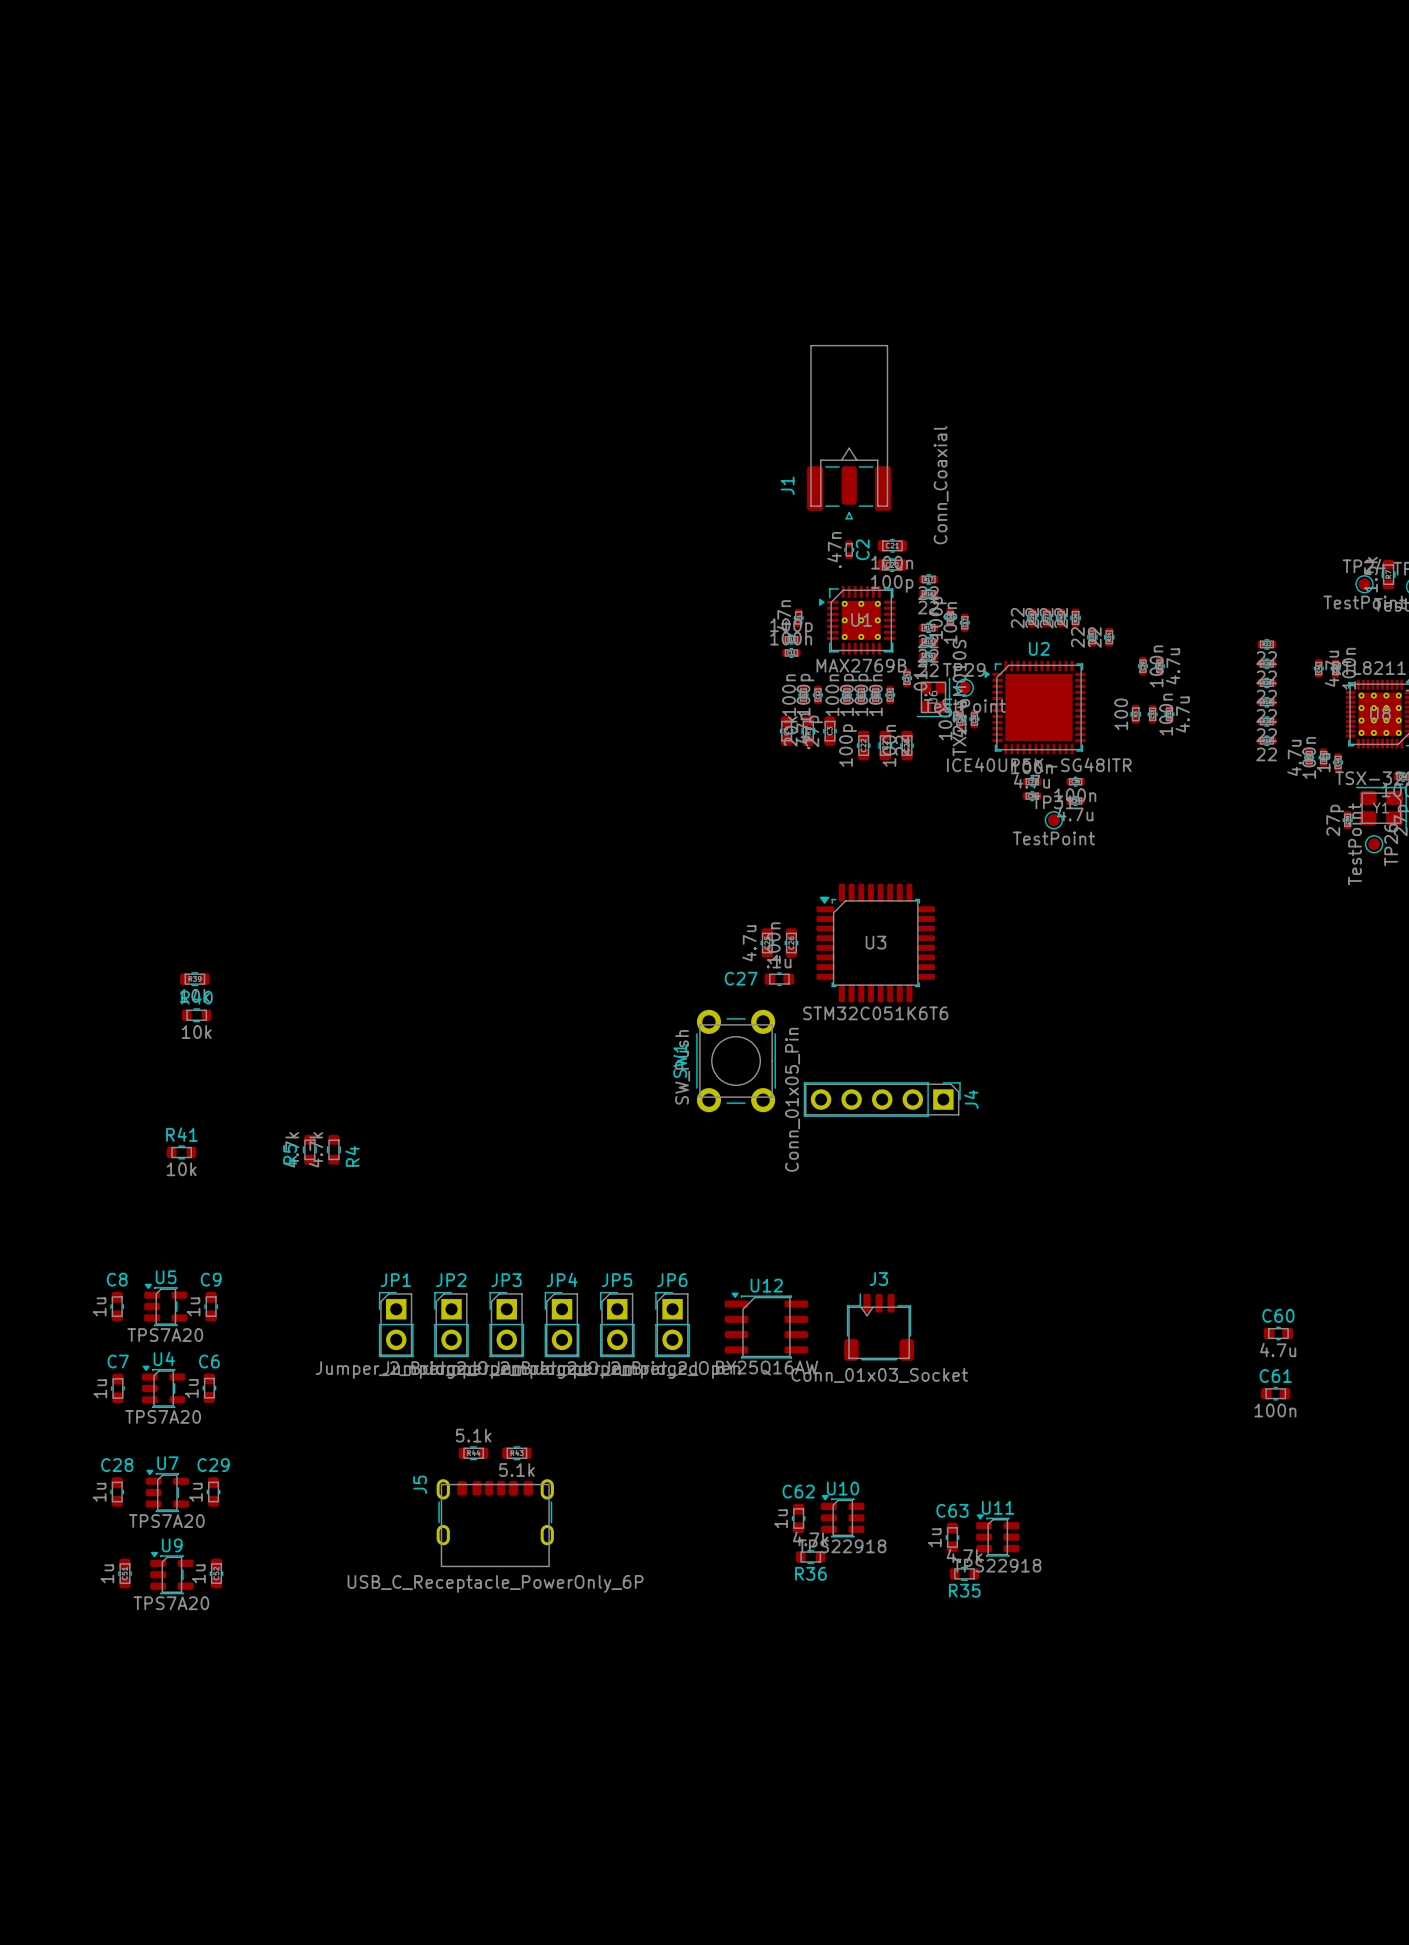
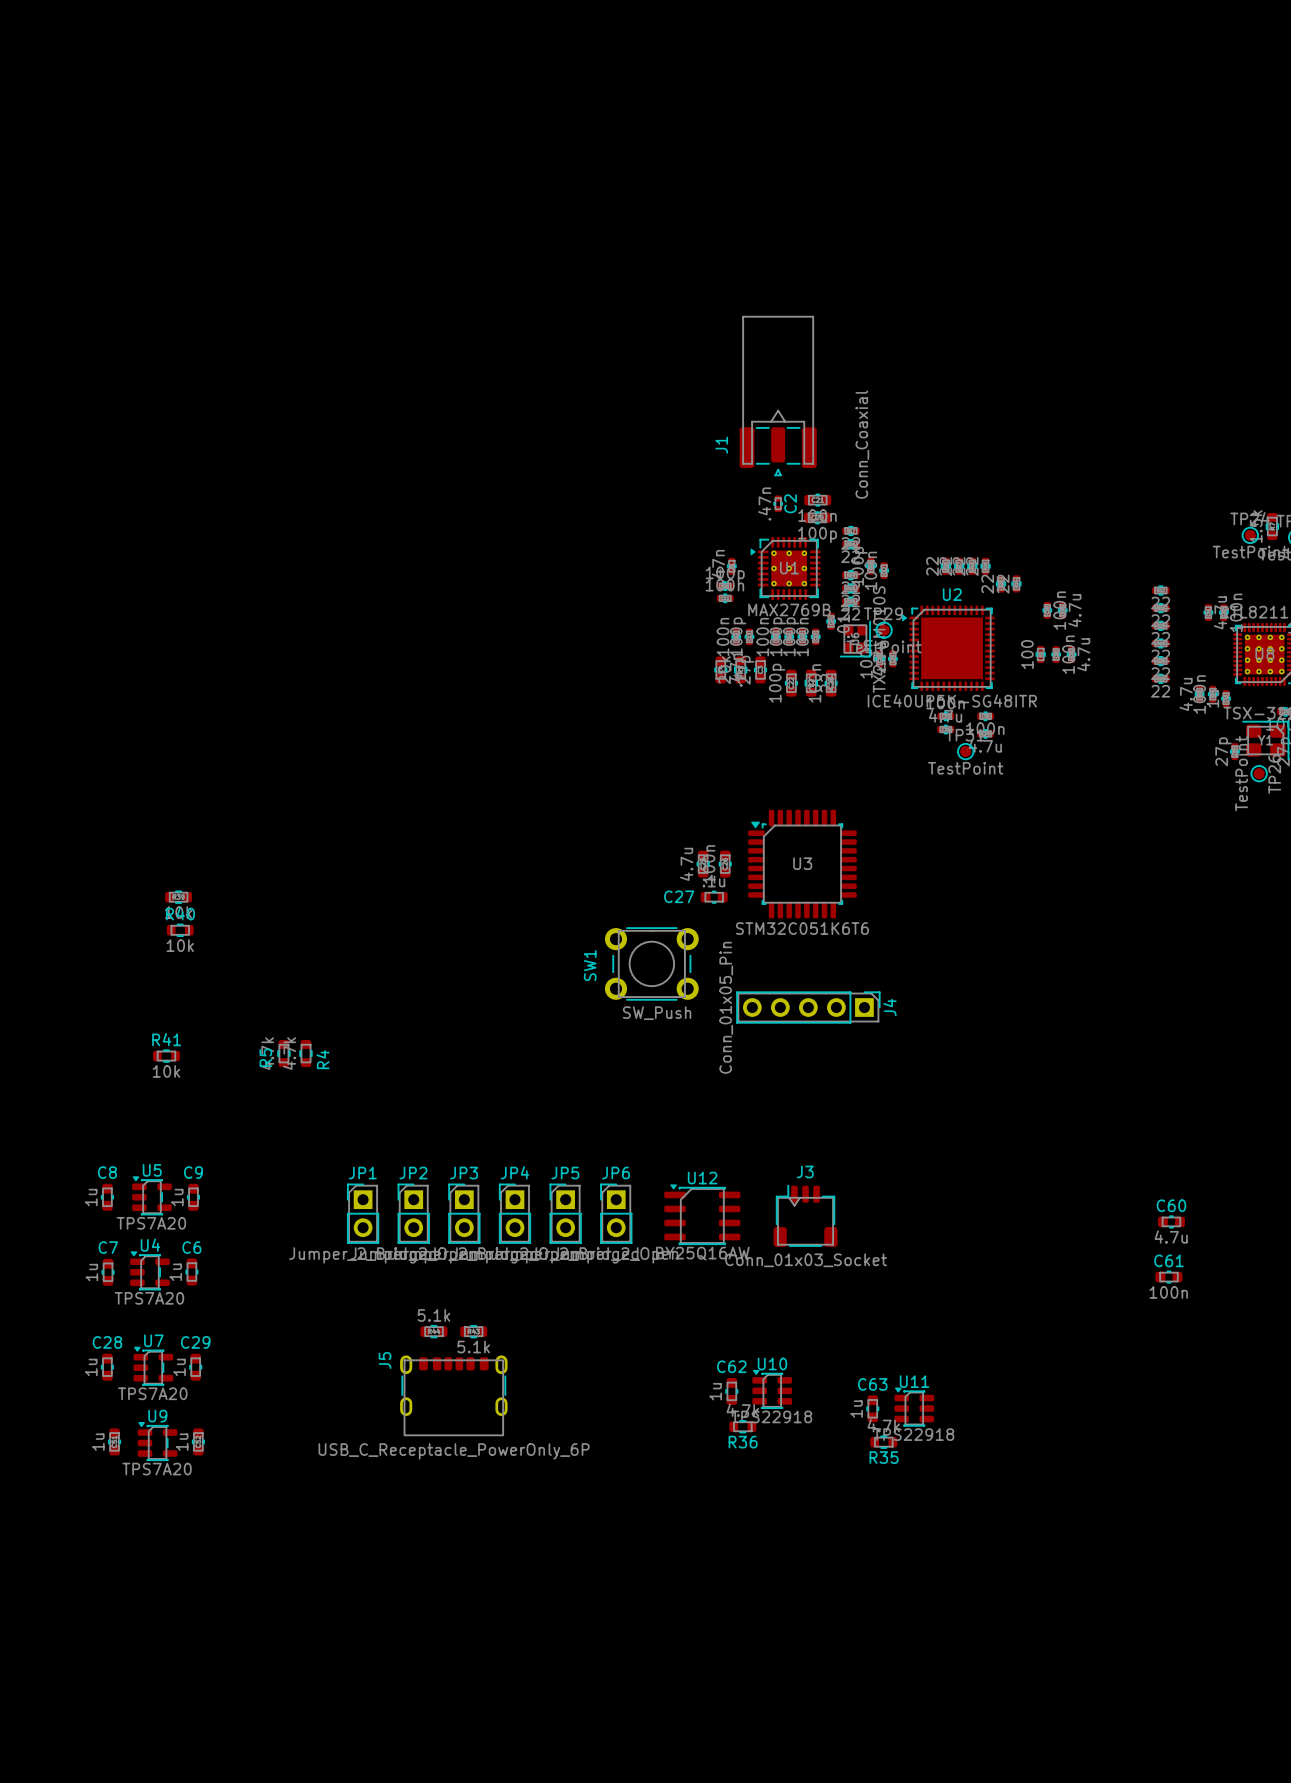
SW1 rotation: 0° (736, 1061) -> 90° counterclockwise (651, 963)

